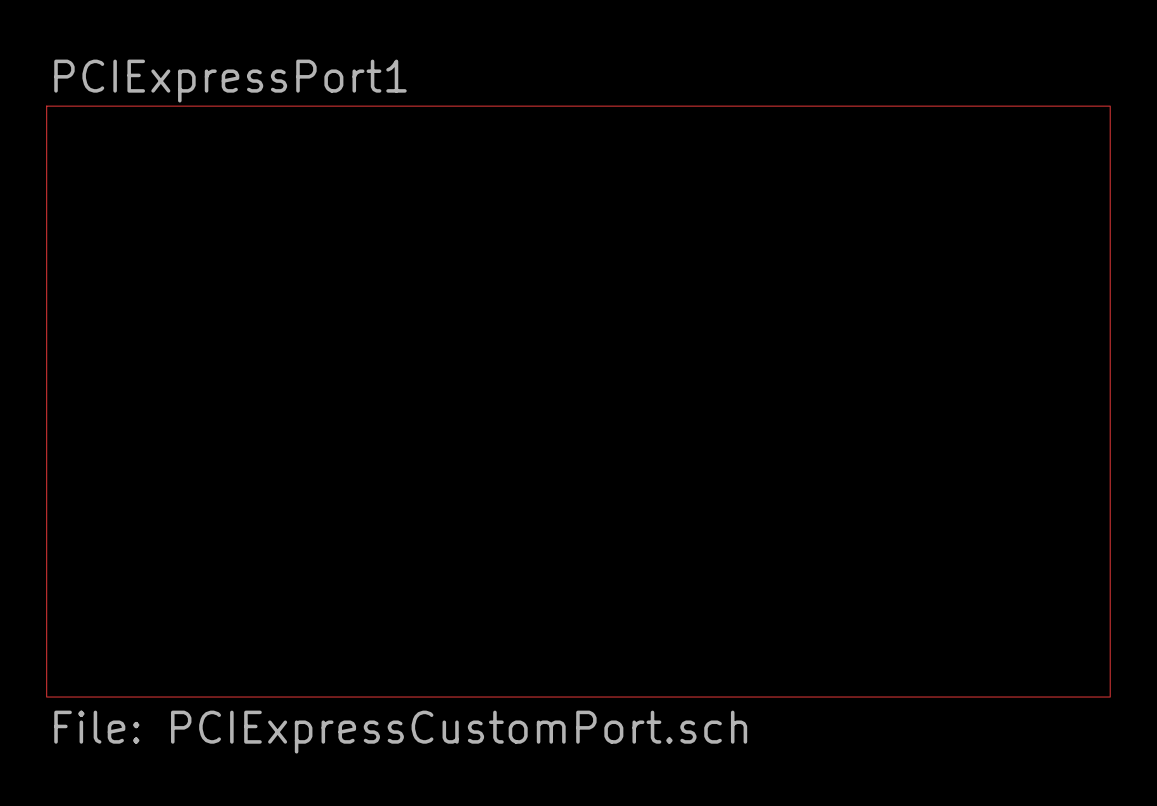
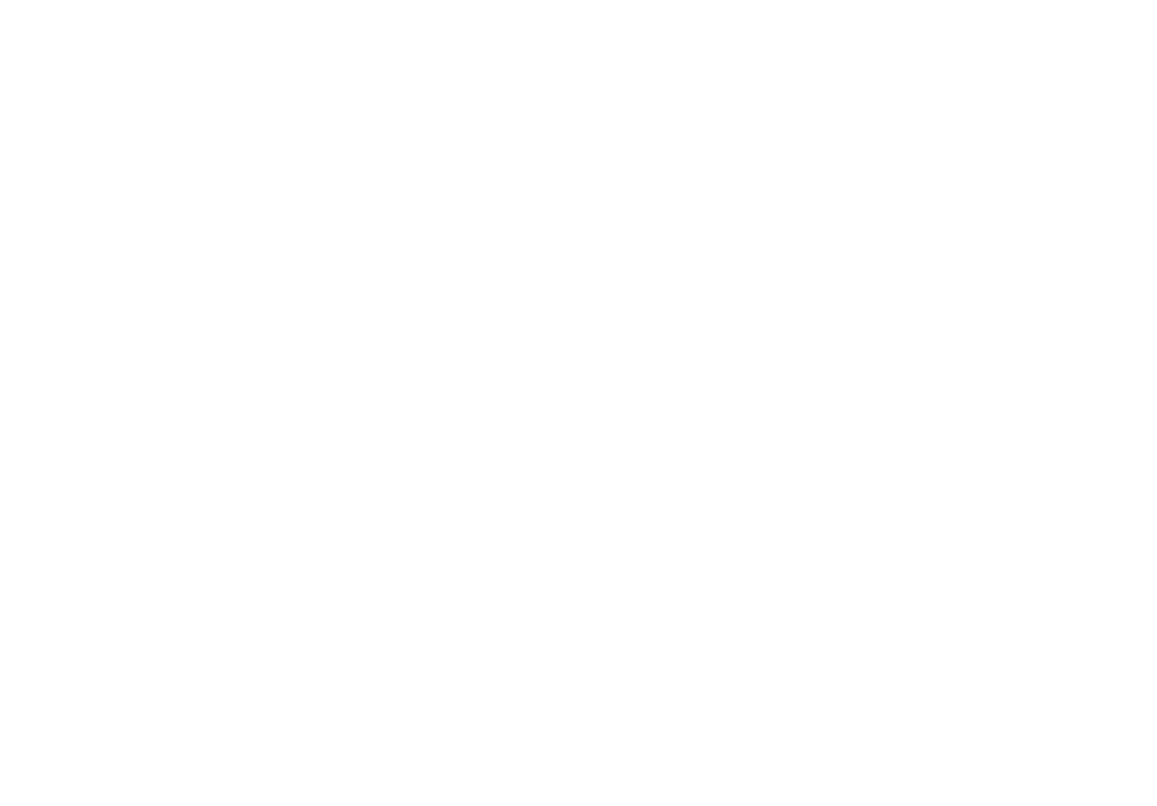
sheet PCIExpressPort1: File: PCIExpressCustomPort.sch (578, 401) -> none

